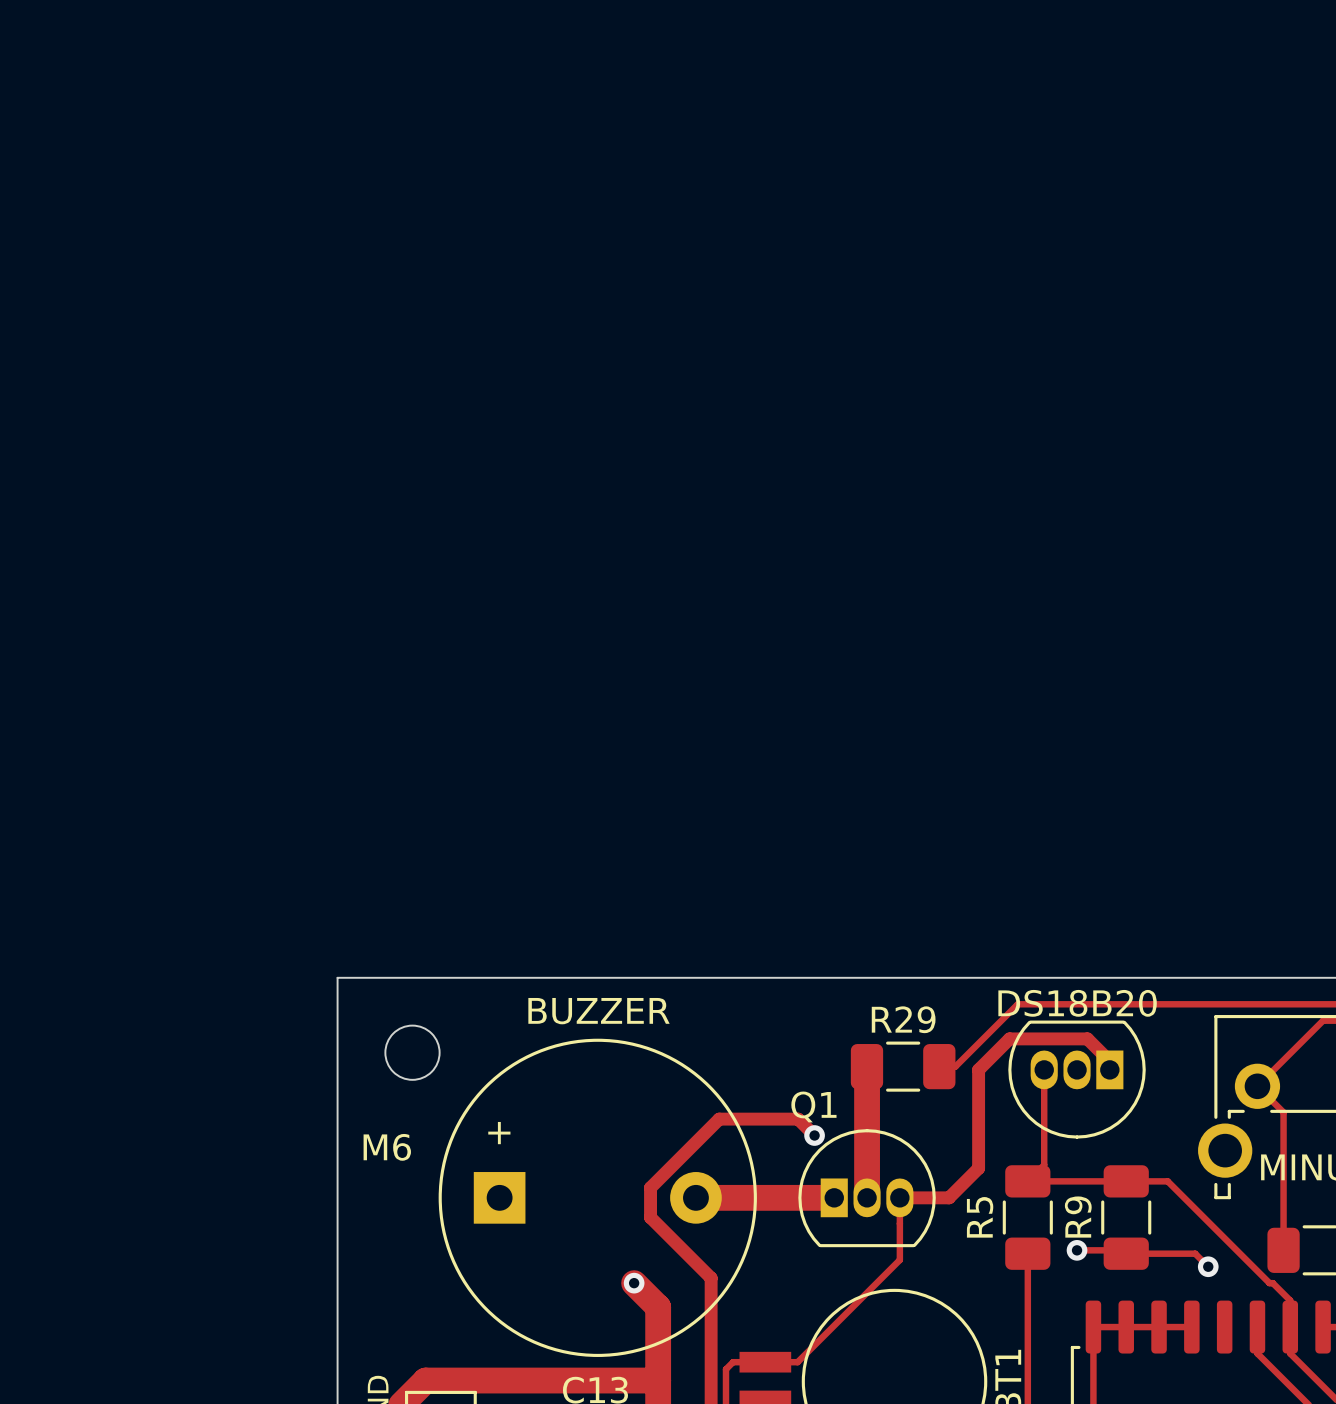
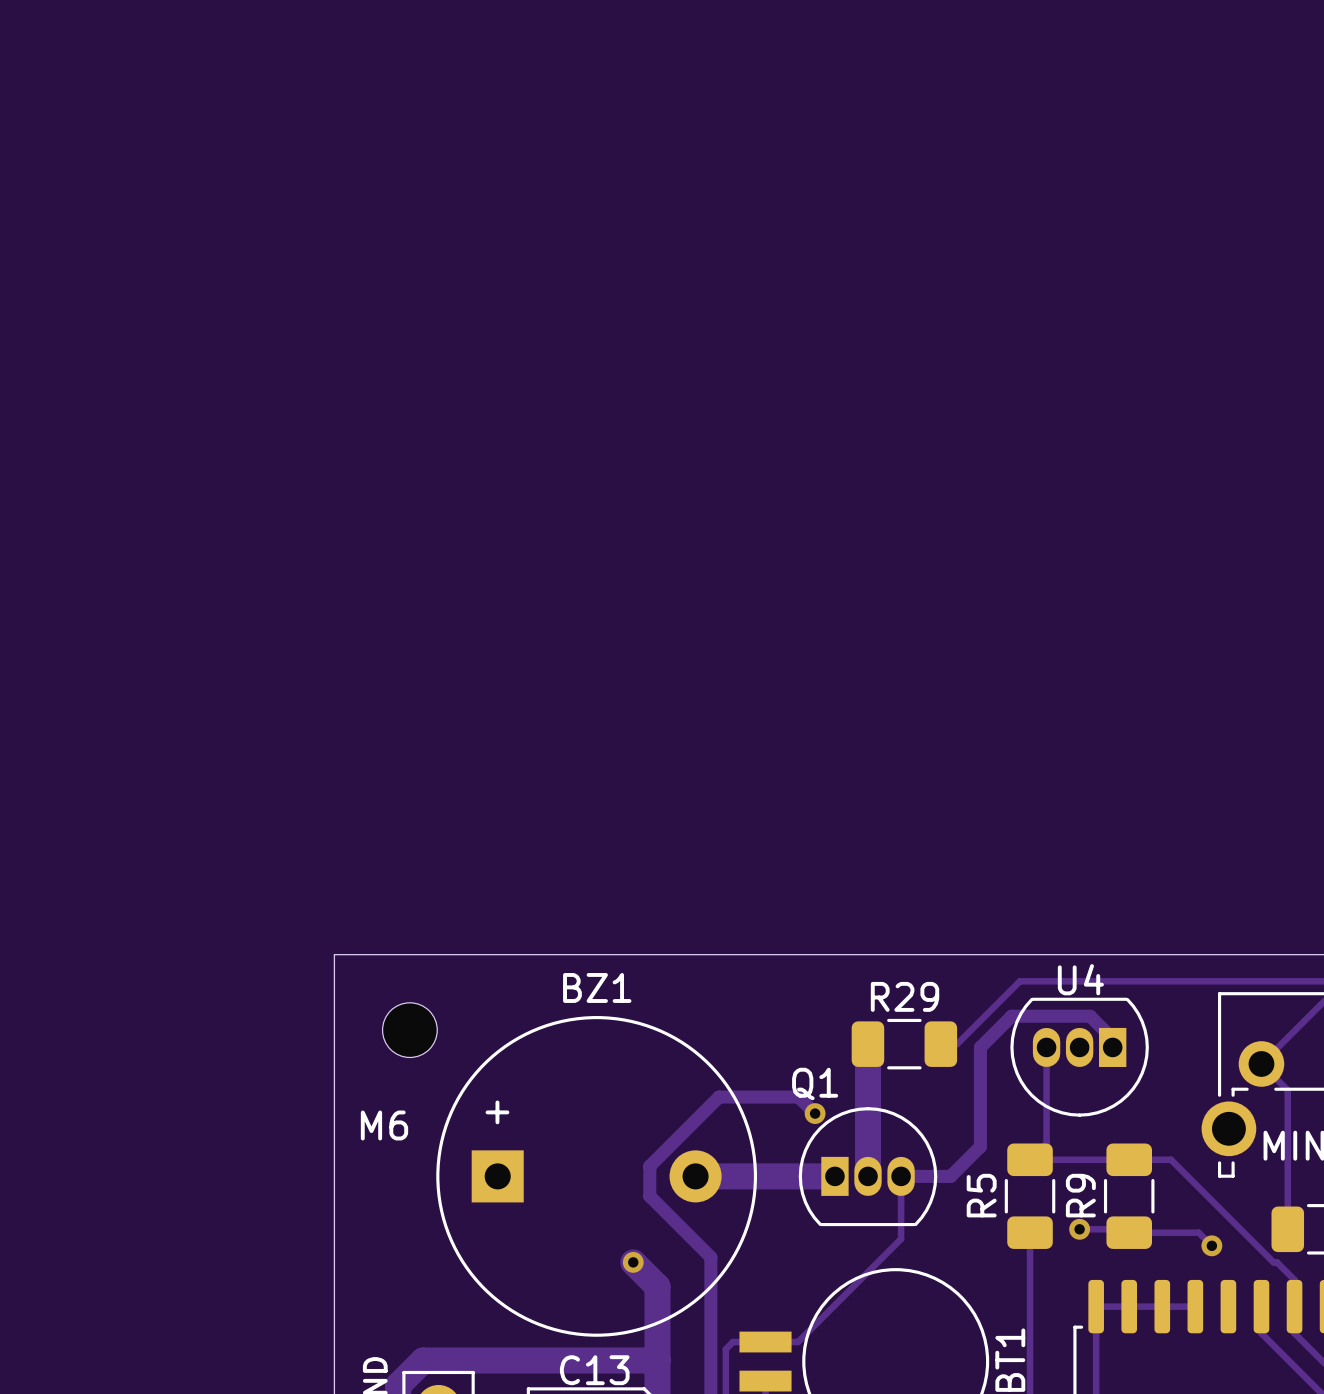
DS18B20 name: DS18B20 (1077, 1003) -> U4 (1080, 979)
BUZZER name: BUZZER (599, 1011) -> BZ1 (597, 987)

